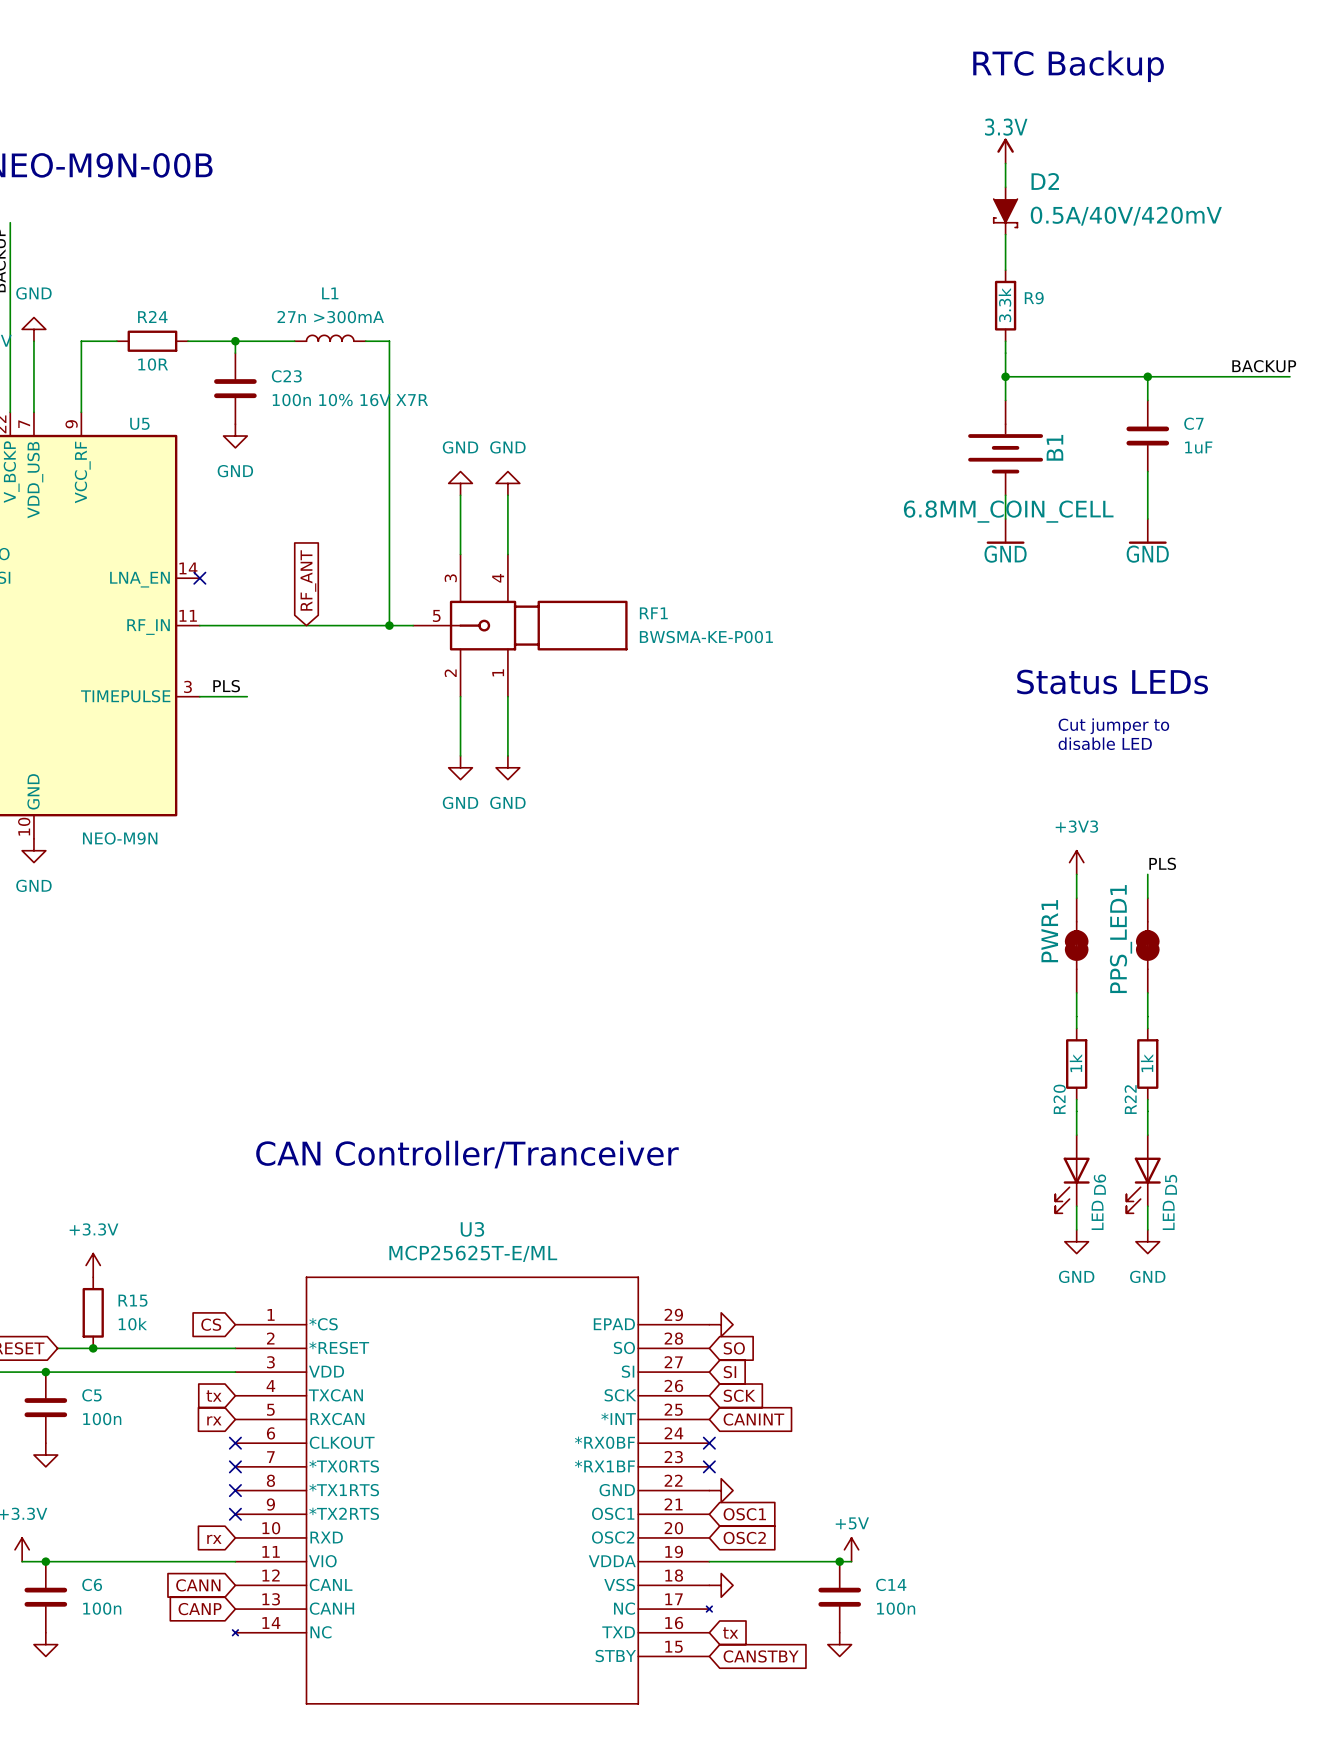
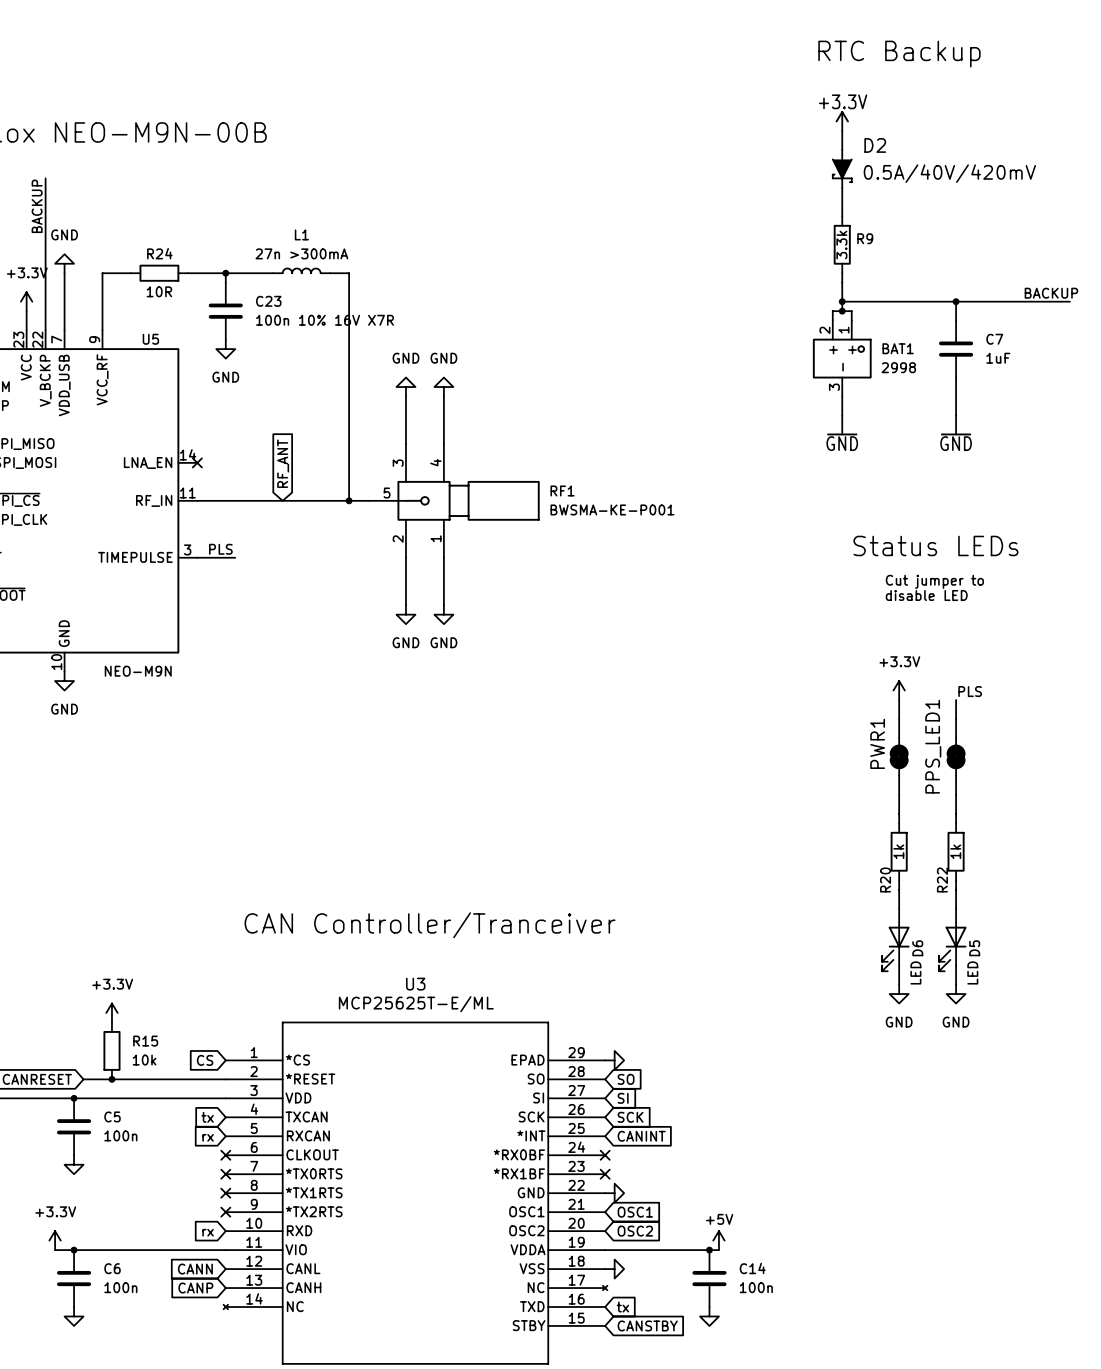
power symbol: 3.3V (1005, 151) -> +3.3V (842, 121)
wire: (1005, 388) (1005, 400) -> none
junction: none -> (842, 311)
wire: none -> (832, 320) (832, 311) (851, 311) (851, 320)
B1: 6.8MM_COIN_CELL (1005, 447) -> none
BAT1: none -> 2998 (842, 358)
power symbol: +3V3 (1076, 862) -> +3.3V (899, 690)

